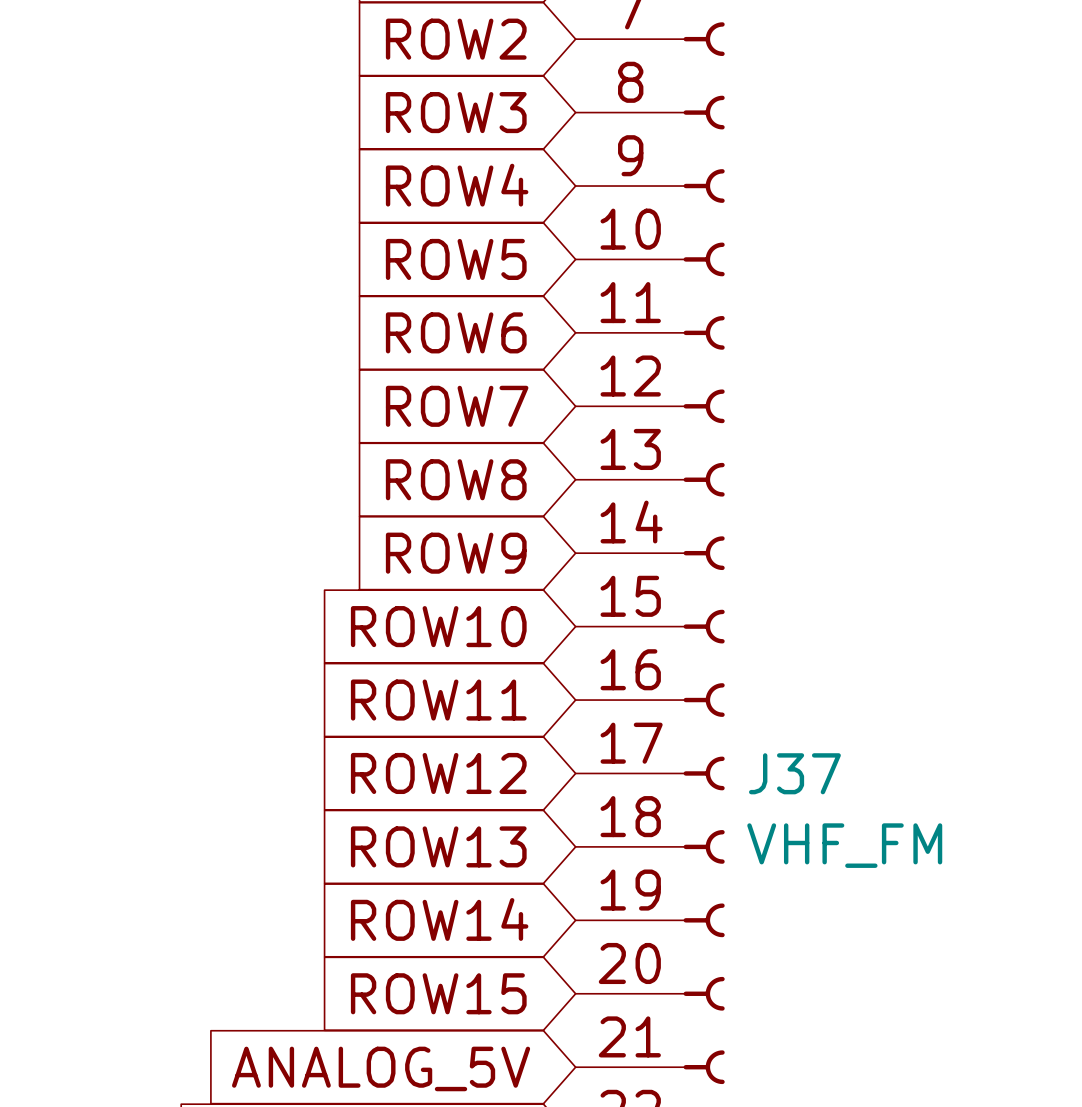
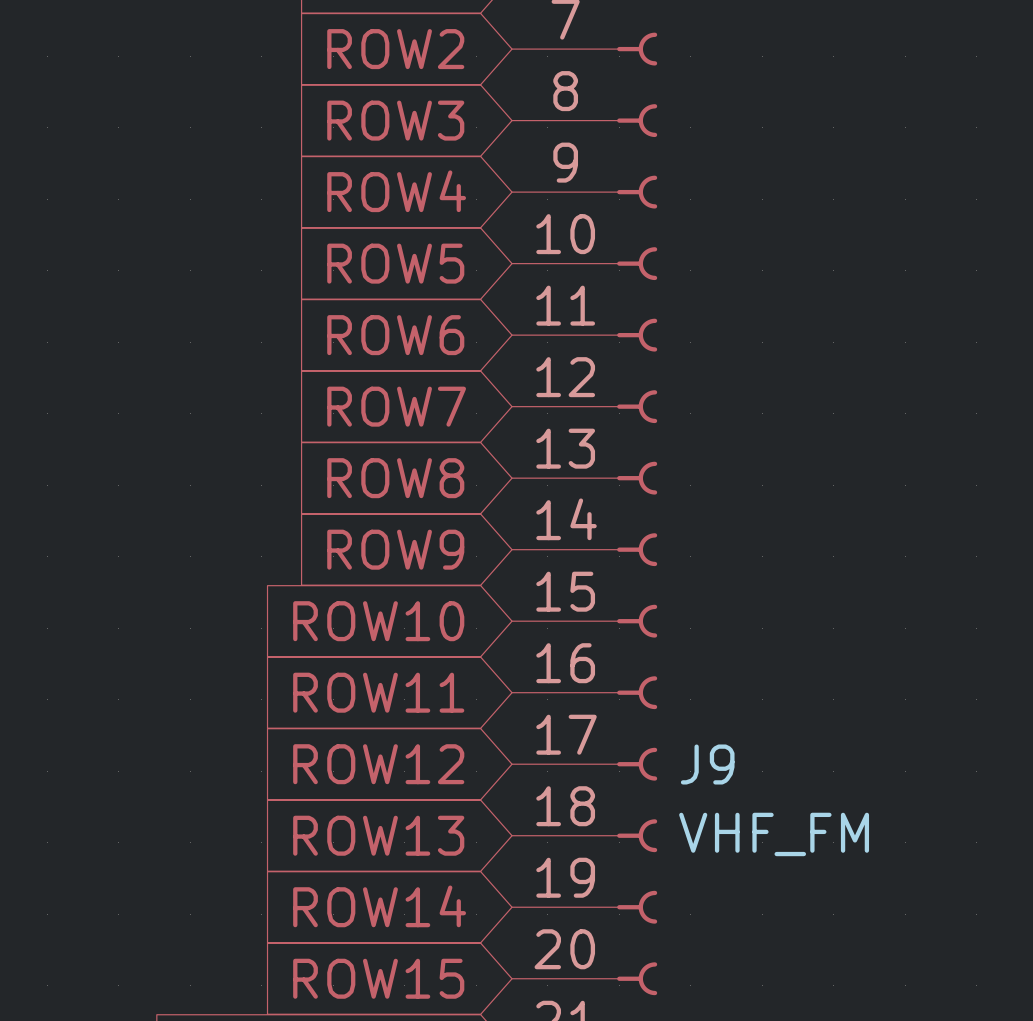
J37 name: J37 (794, 773) -> J9 (707, 764)

